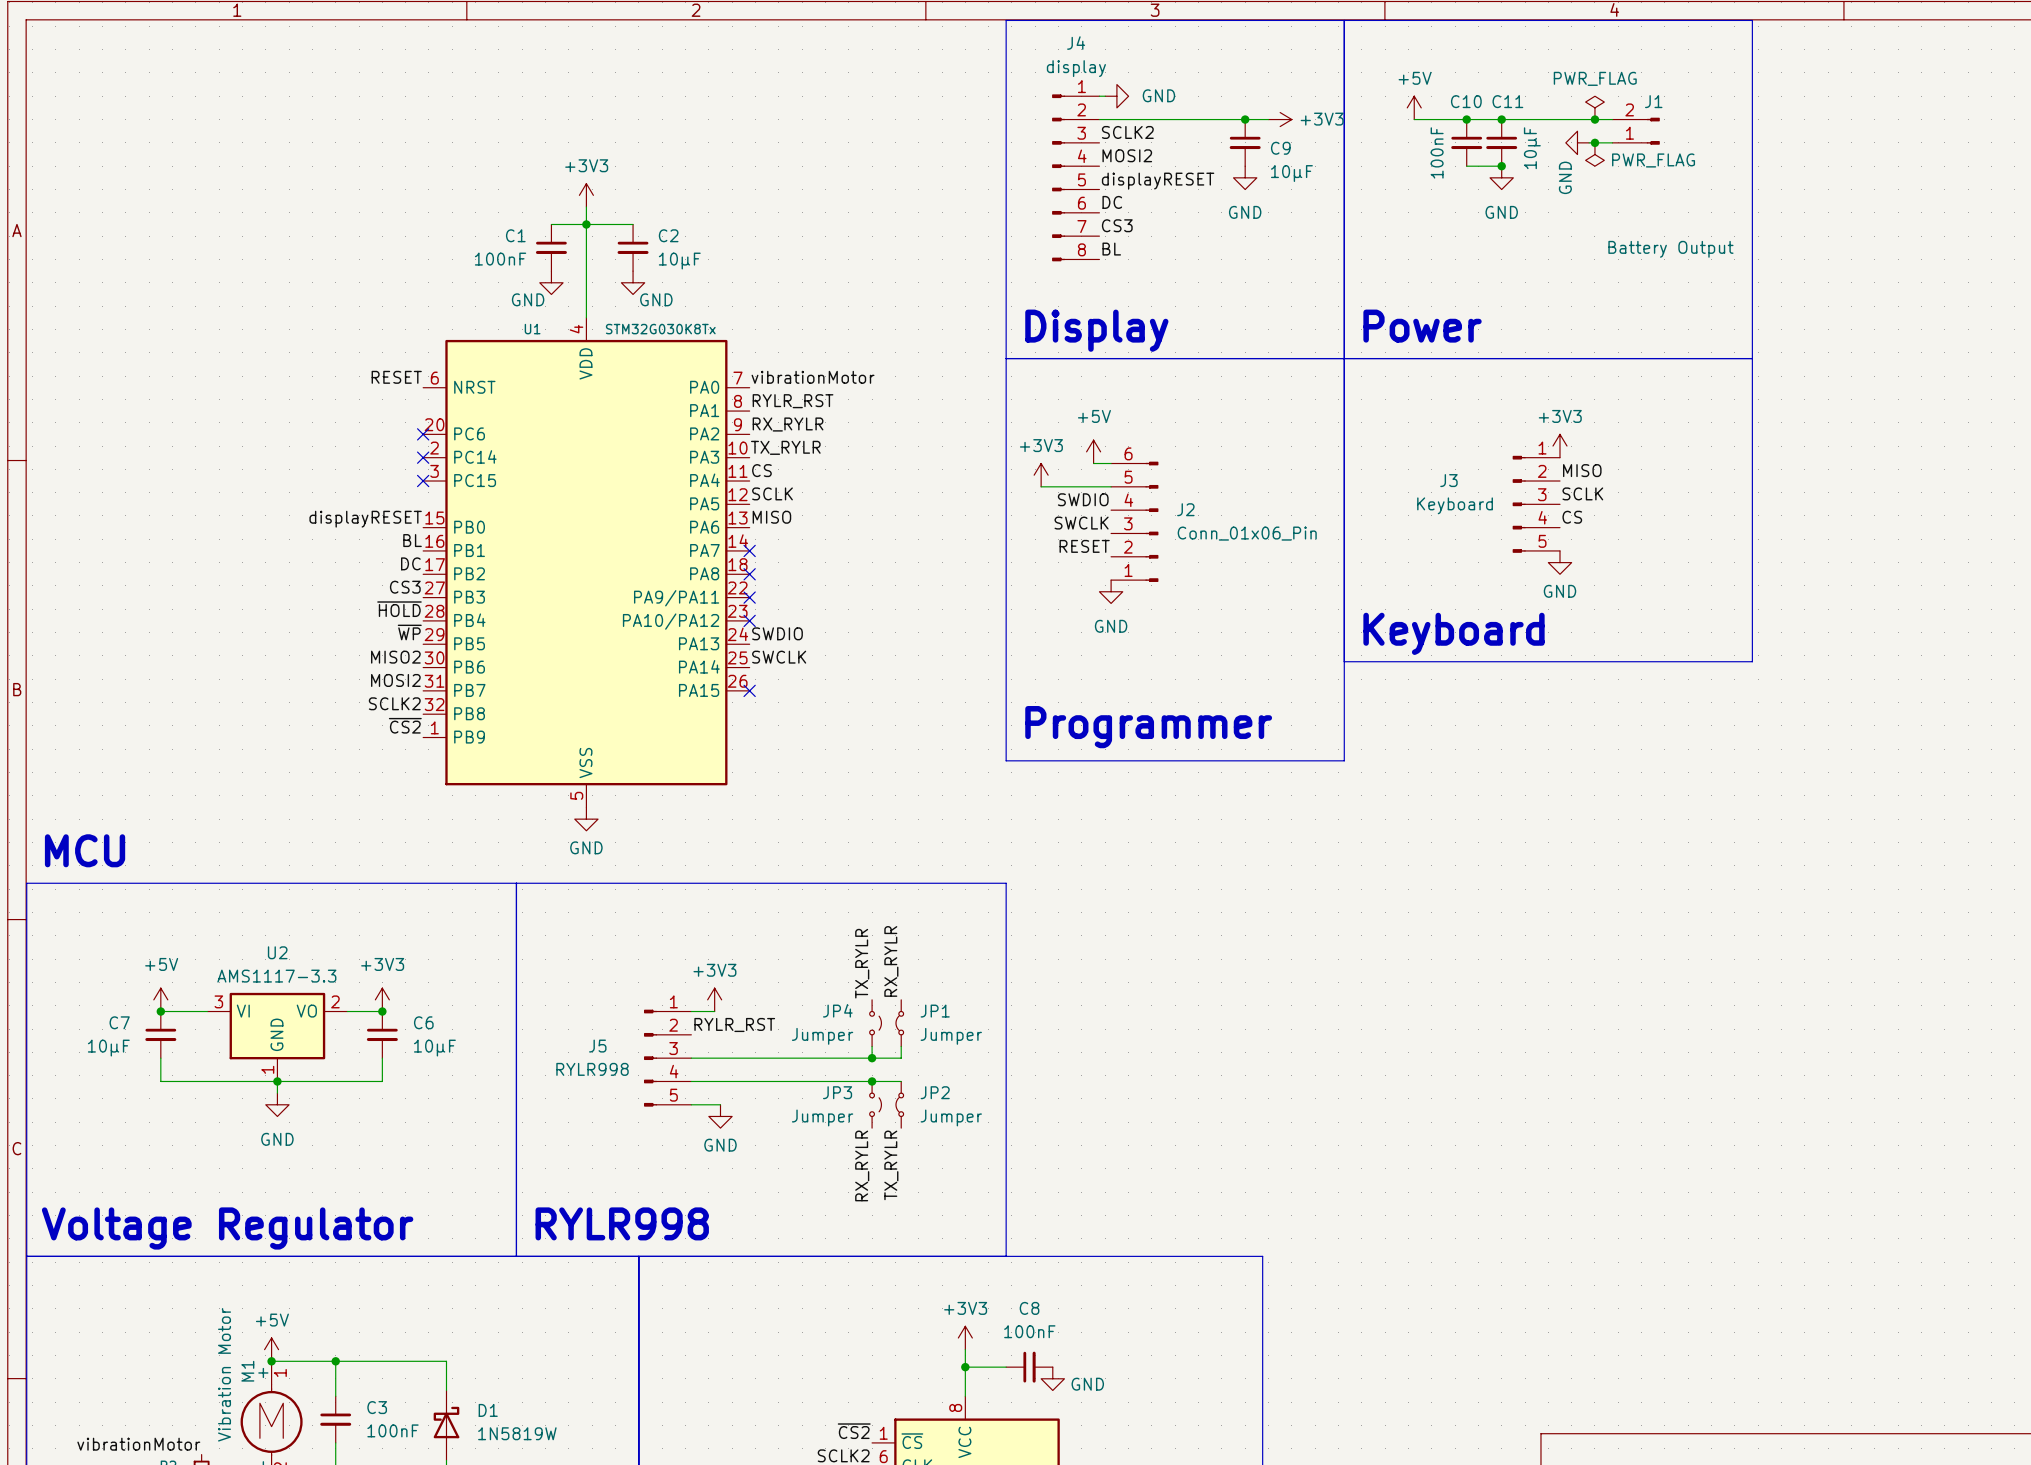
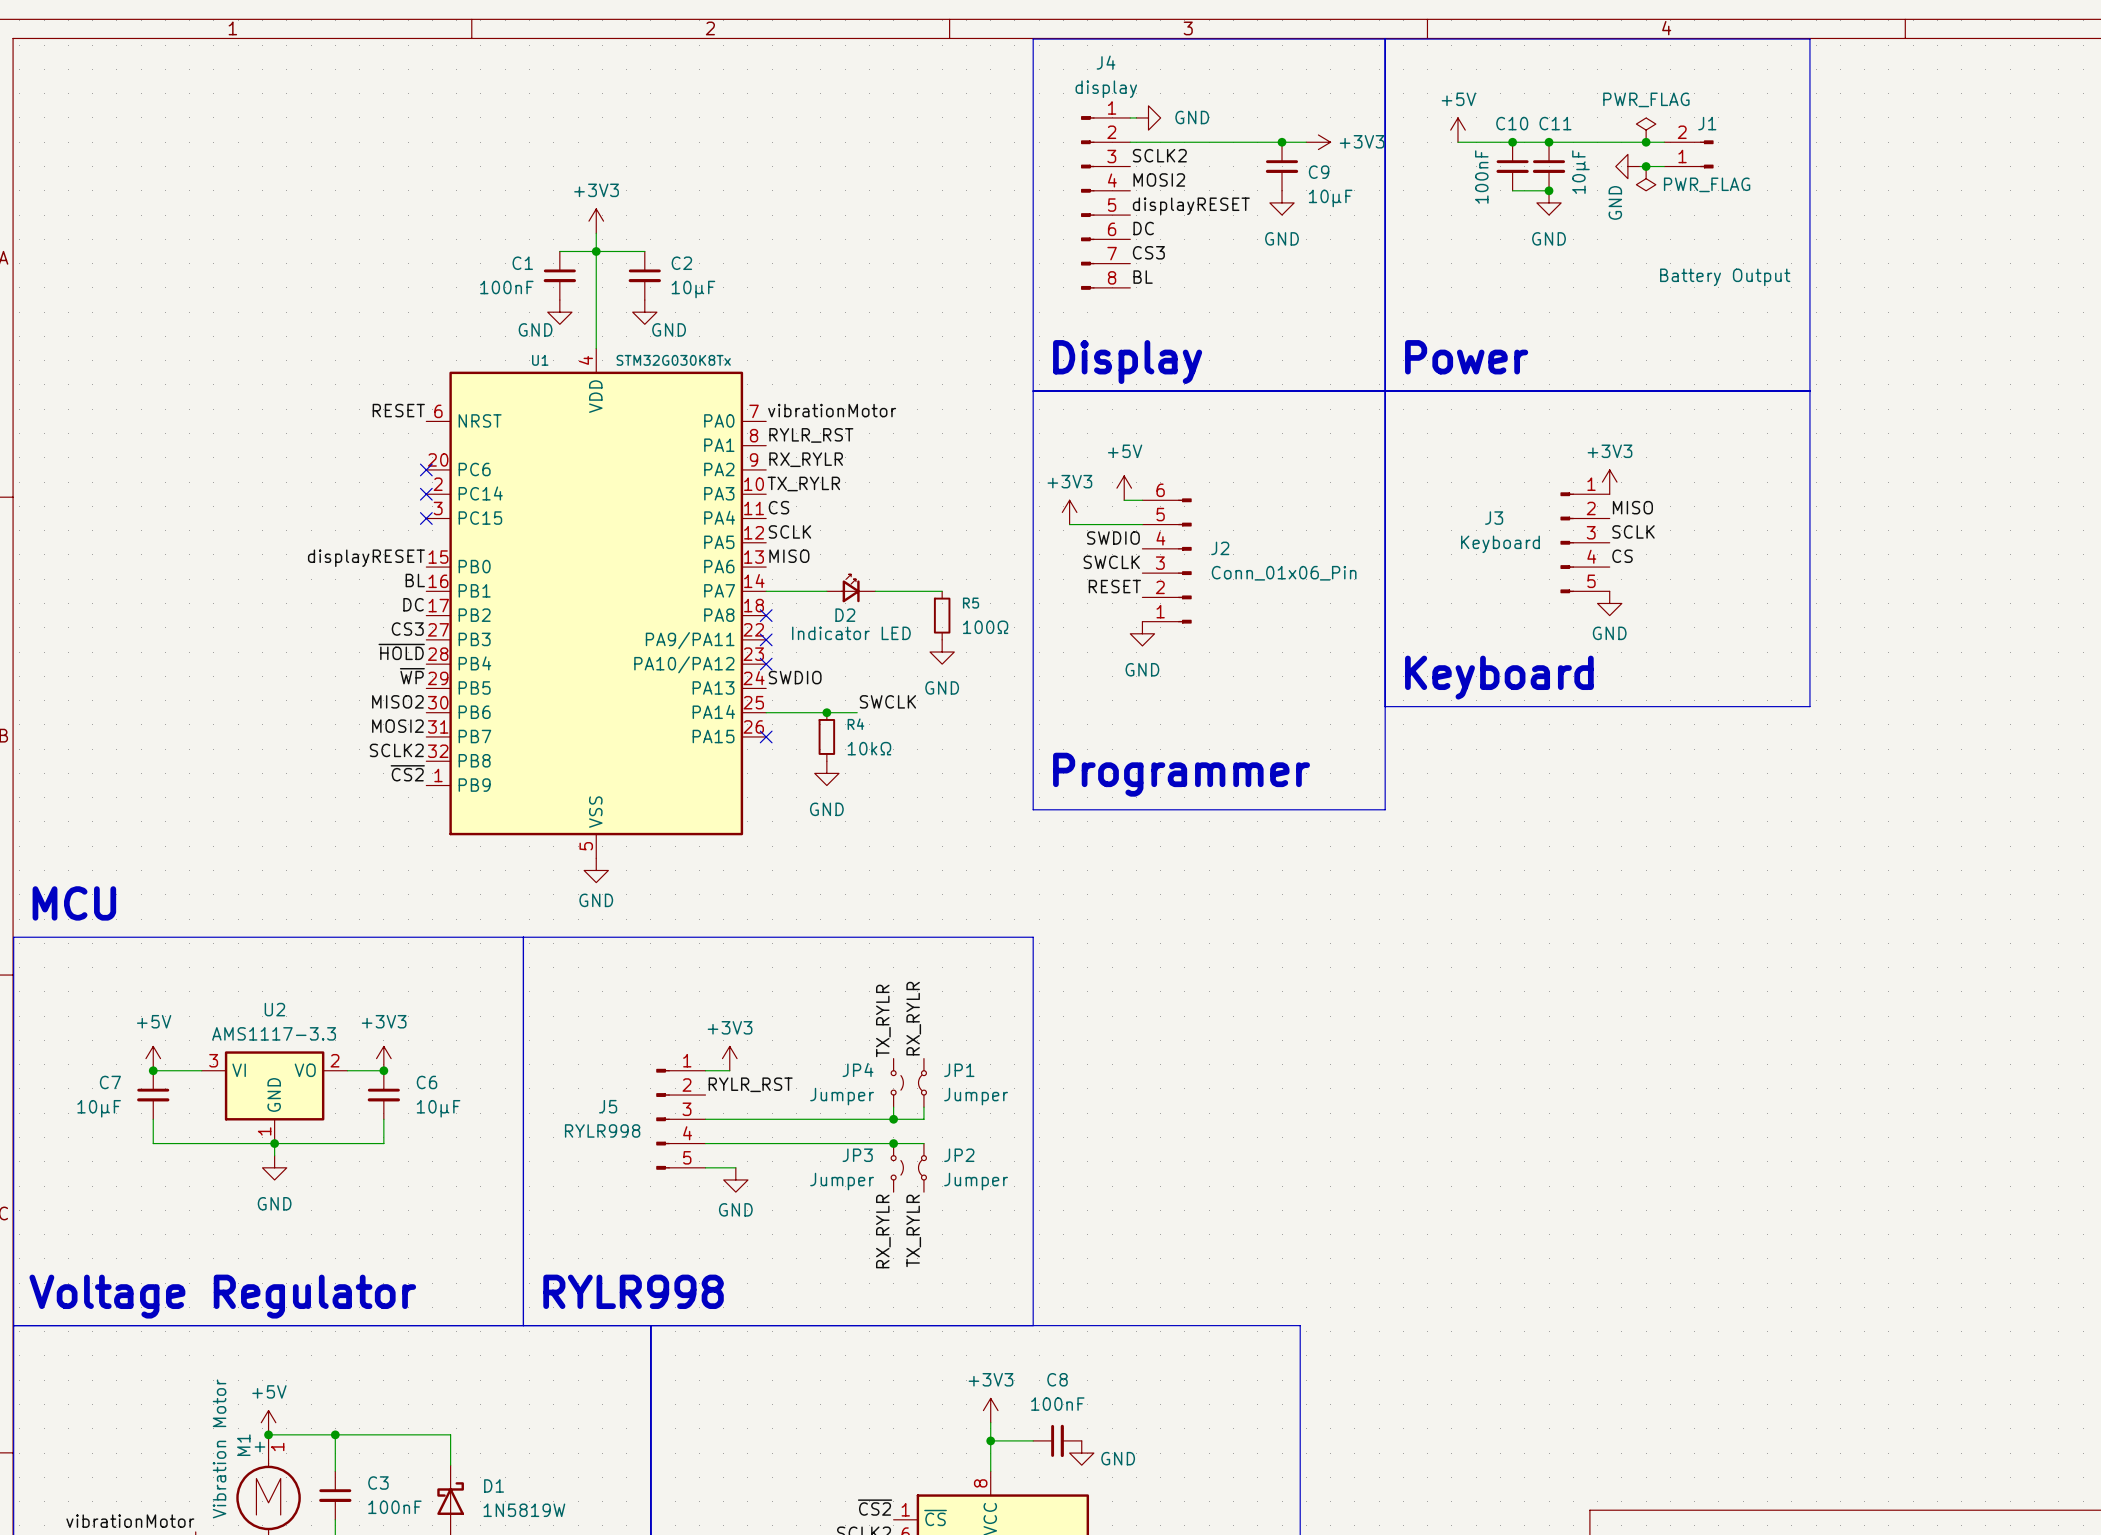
D2: none -> Indicator LED (851, 588)
wire: none -> (766, 591) (826, 591)
no-connect mark: (749, 550) -> none
wire: none -> (875, 591) (942, 591)
R5: none -> 100Ω (942, 615)
power symbol: none -> GND (942, 652)
label position: SWCLK (779, 657) -> SWCLK (887, 701)
wire: none -> (766, 712) (857, 712)
junction: none -> (826, 712)
R4: none -> 10kΩ (826, 736)
power symbol: none -> GND (826, 773)

